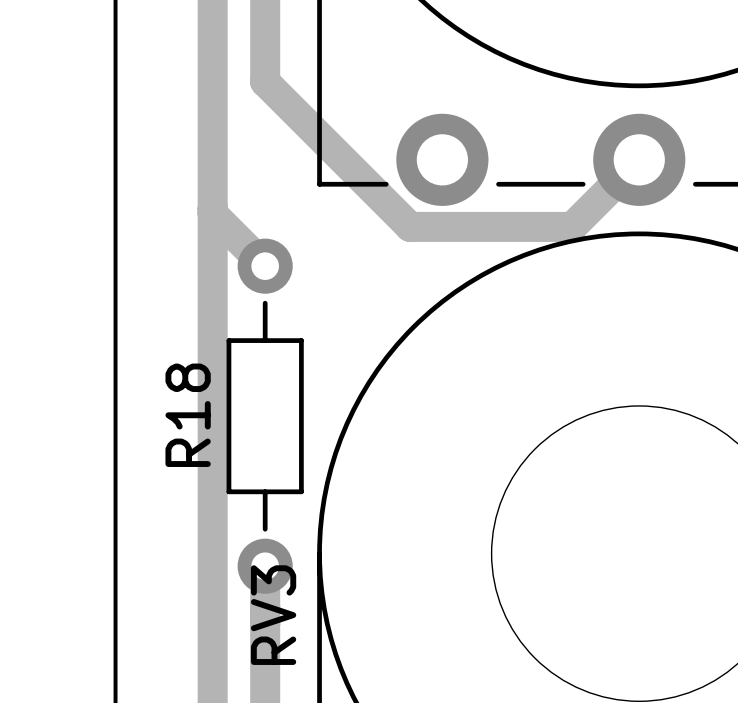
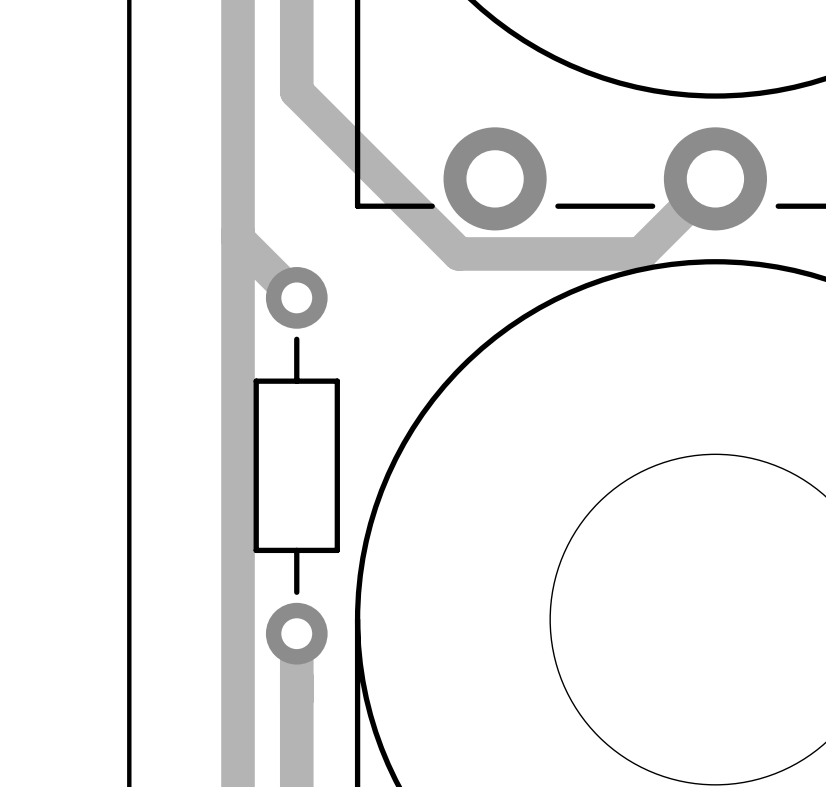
R18 name: R18 (188, 415) -> none
RV3 name: RV3 (273, 615) -> none

